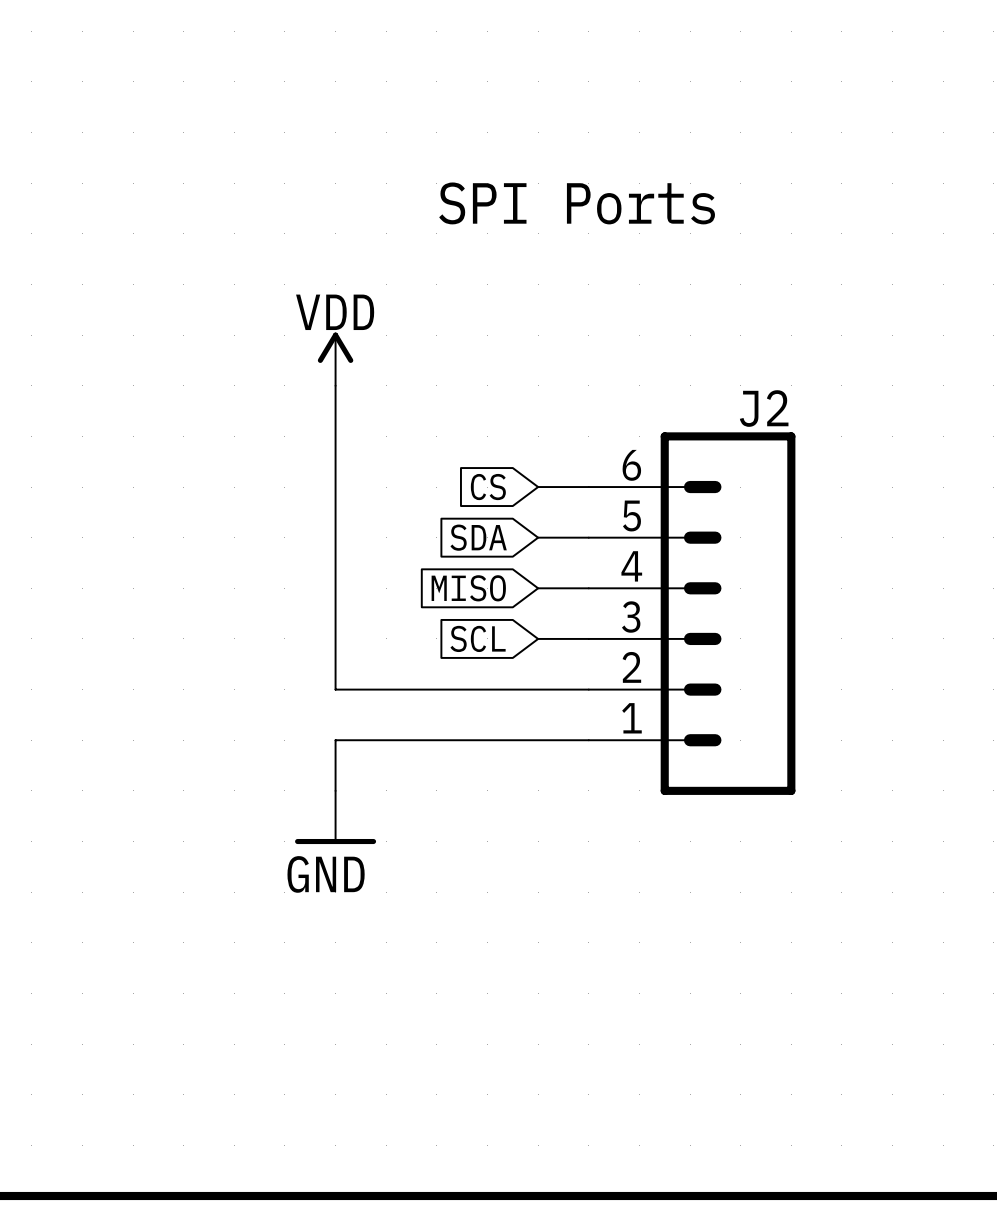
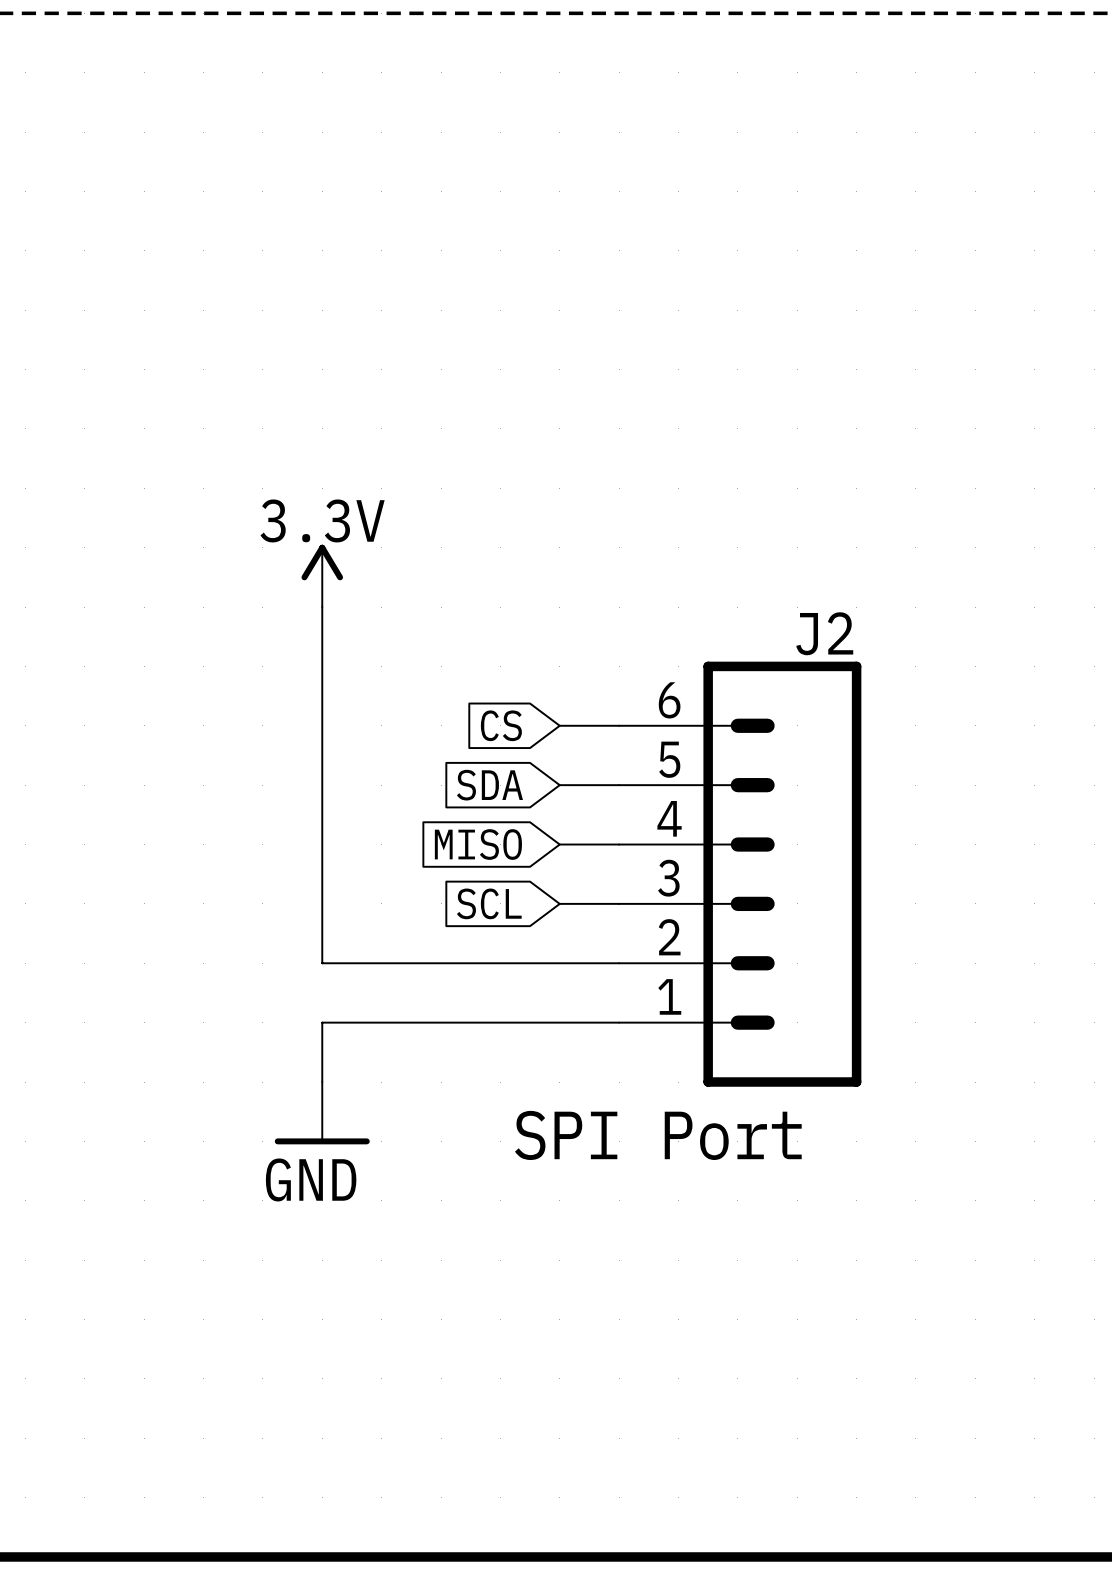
text: SPI Ports (577, 203) -> none
power symbol: VDD (335, 359) -> 3.3V (322, 575)
text: none -> SPI Port (658, 1135)

